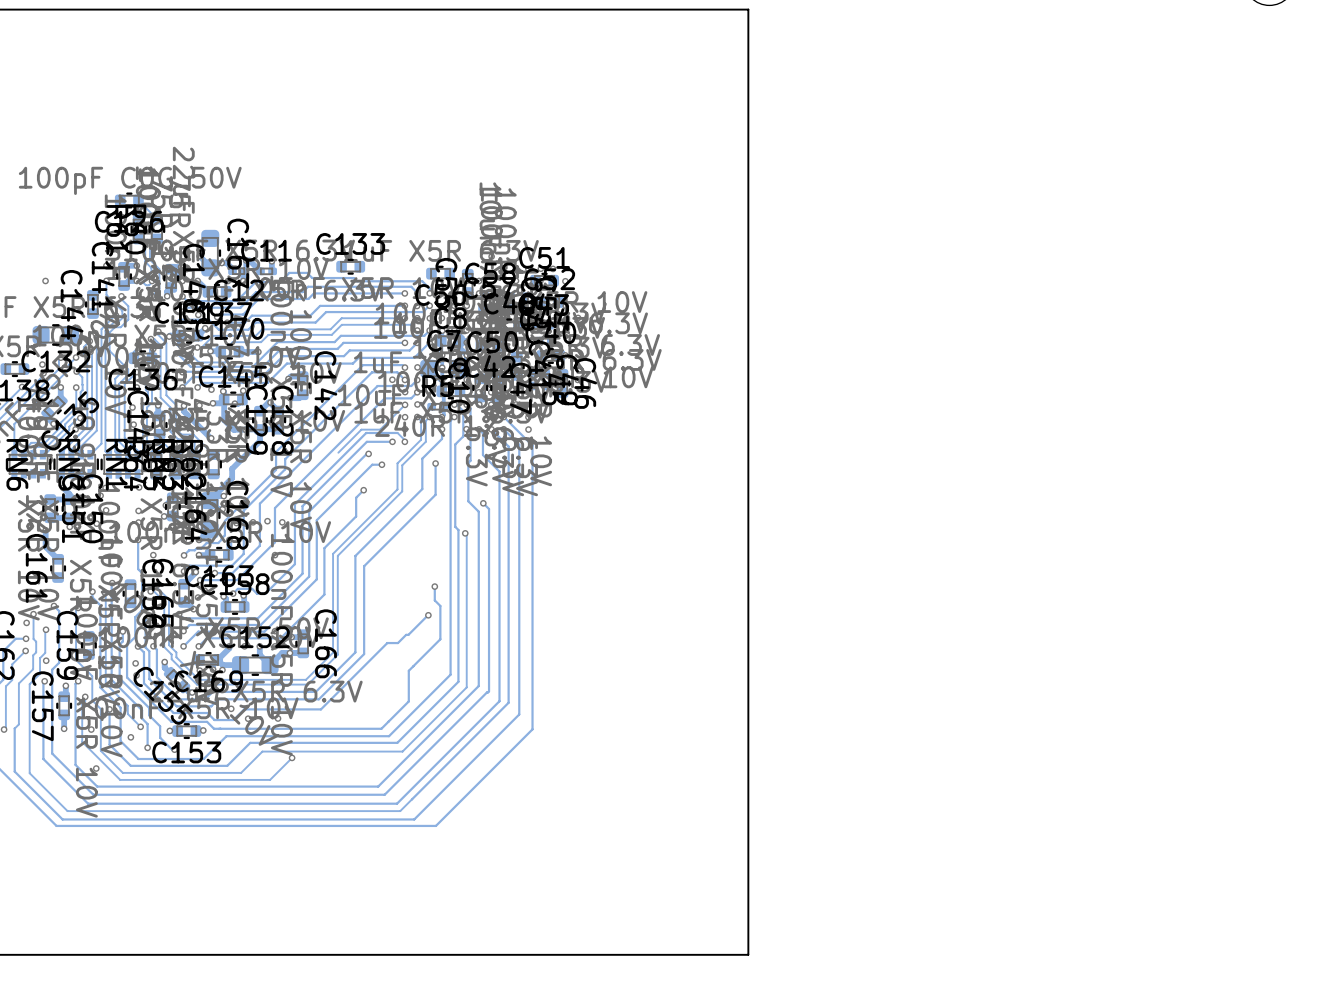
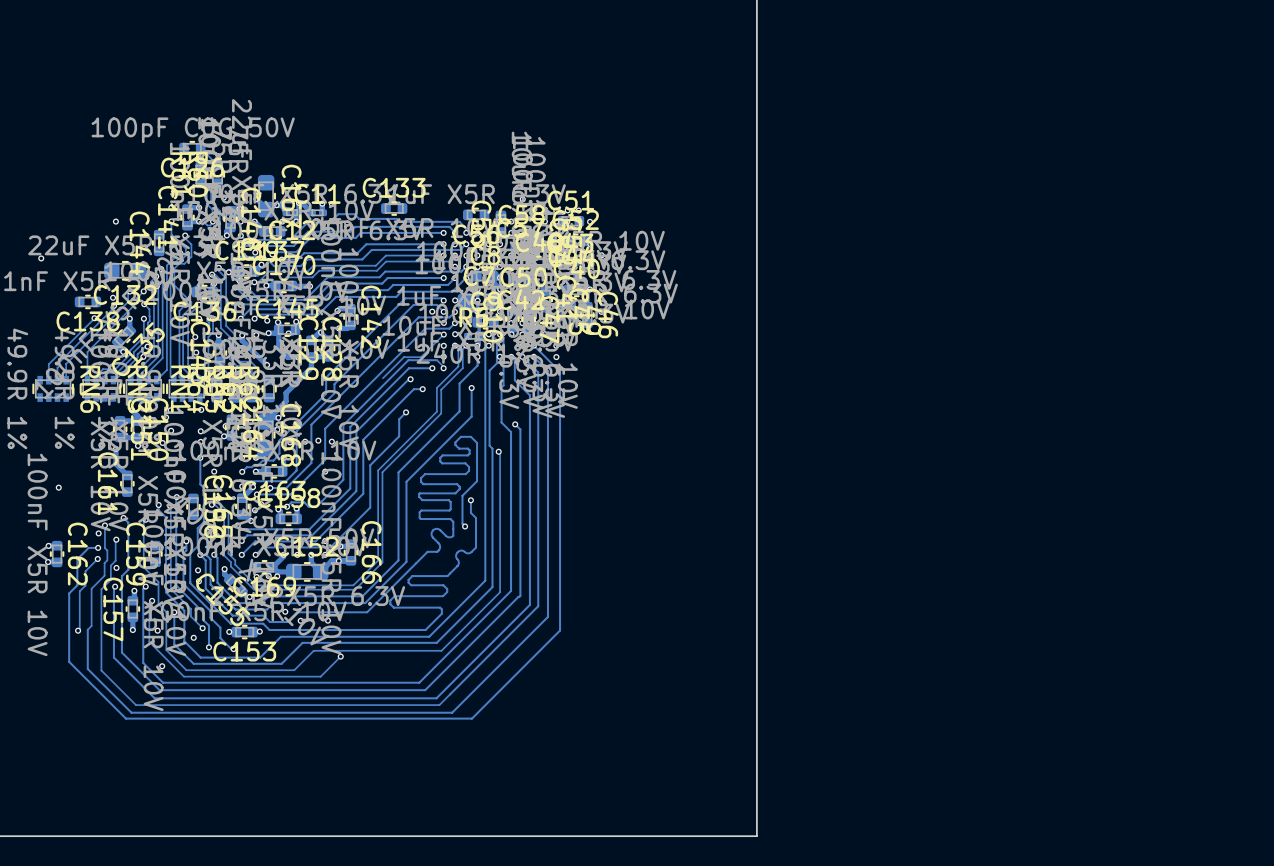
track: (428, 615) (399, 641) -> (465, 526) (462, 523) (462, 495) (477, 481) (477, 442) (470, 436) (460, 436) (455, 442) (459, 448) (469, 450) (468, 455) (442, 455) (440, 457) (442, 463) (465, 463) (469, 467) (469, 470) (465, 474) (425, 474) (421, 478) (423, 484) (457, 484) (459, 486) (455, 493) (419, 494) (422, 500) (448, 500) (450, 502) (449, 510) (421, 510) (419, 512) (420, 519) (450, 519) (453, 521) (451, 536) (446, 536) (437, 528) (432, 531) (432, 536) (439, 545) (438, 550)
track: (440, 638) (408, 670) (408, 683) -> (476, 547) (469, 553) (461, 550) (457, 552) (456, 556) (458, 564) (447, 576) (412, 576) (408, 579) (411, 585) (443, 585) (447, 589)
track: (408, 687) (408, 701) (381, 728) -> (447, 592) (443, 596) (394, 596) (390, 600) (390, 604) (393, 607) (440, 607) (441, 613) (425, 630) (422, 630)

